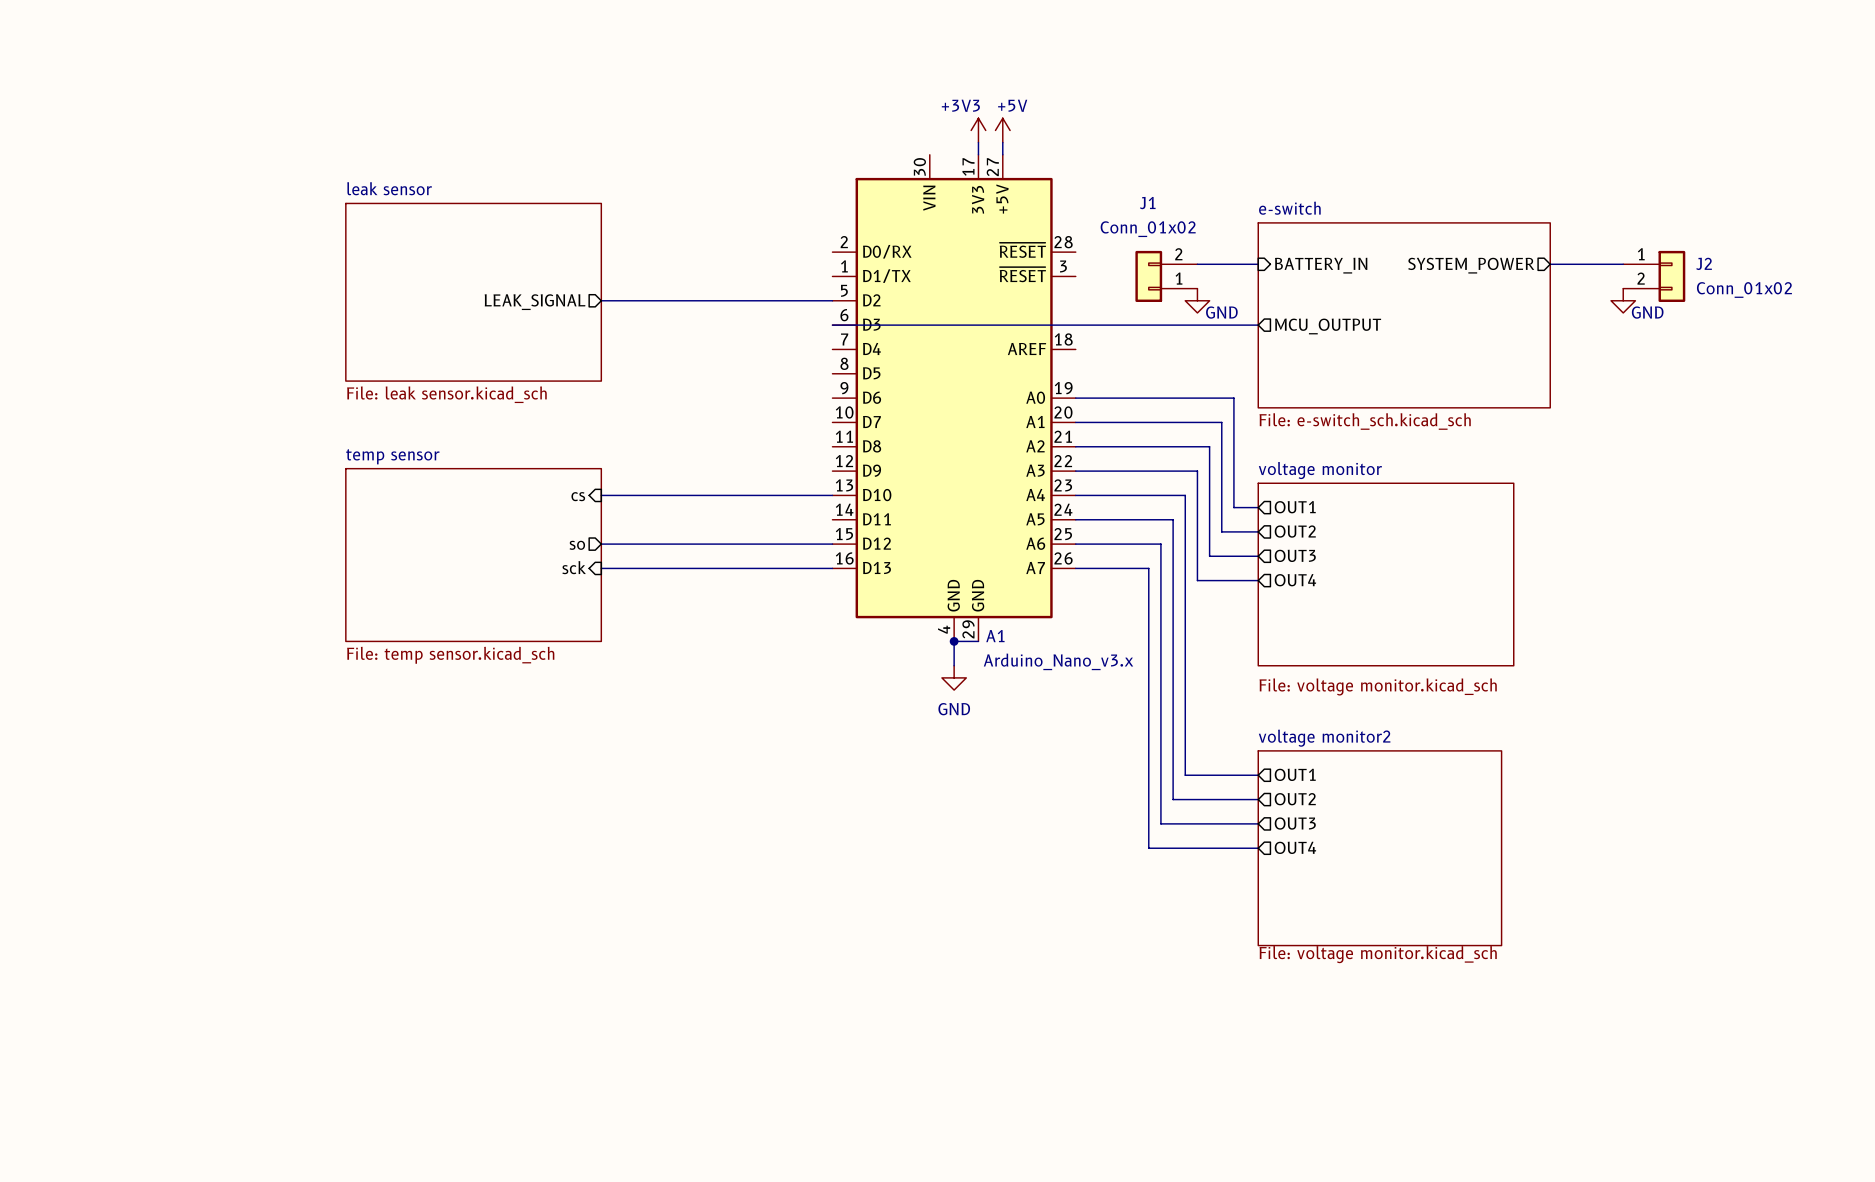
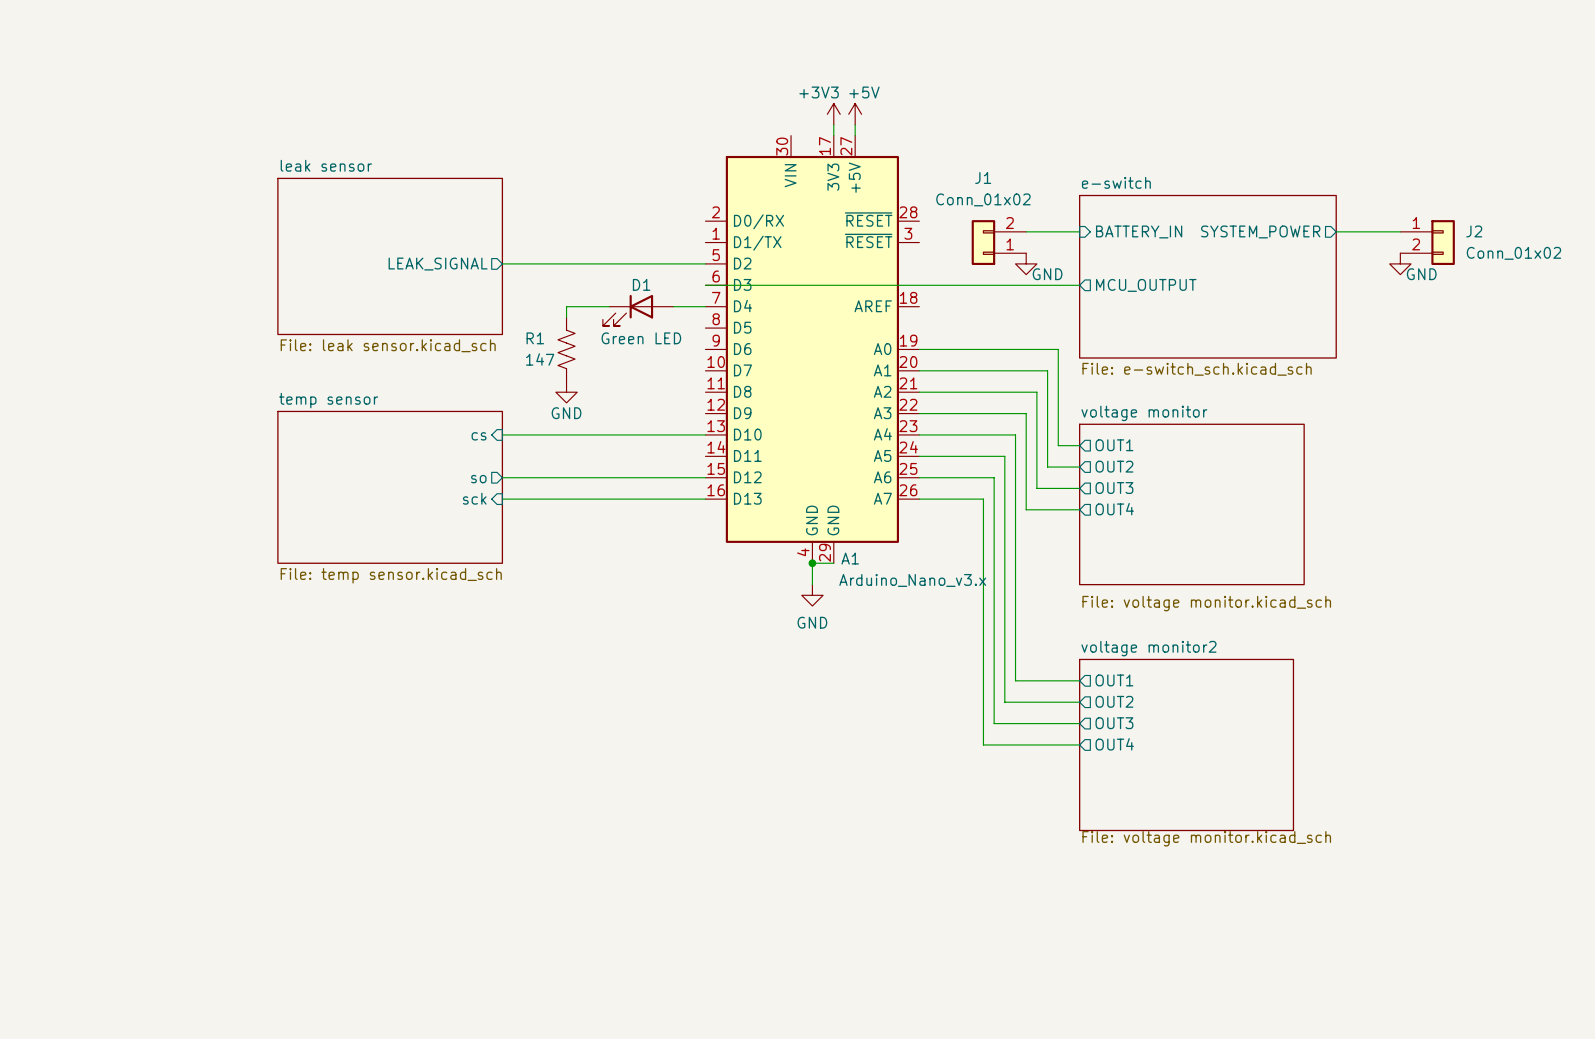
wire: none -> (609, 306) (566, 306) (566, 317)
wire: none -> (673, 306) (705, 306)
D1: none -> Green LED (638, 310)
R1: none -> 147 (566, 349)
power symbol: none -> GND (566, 392)

